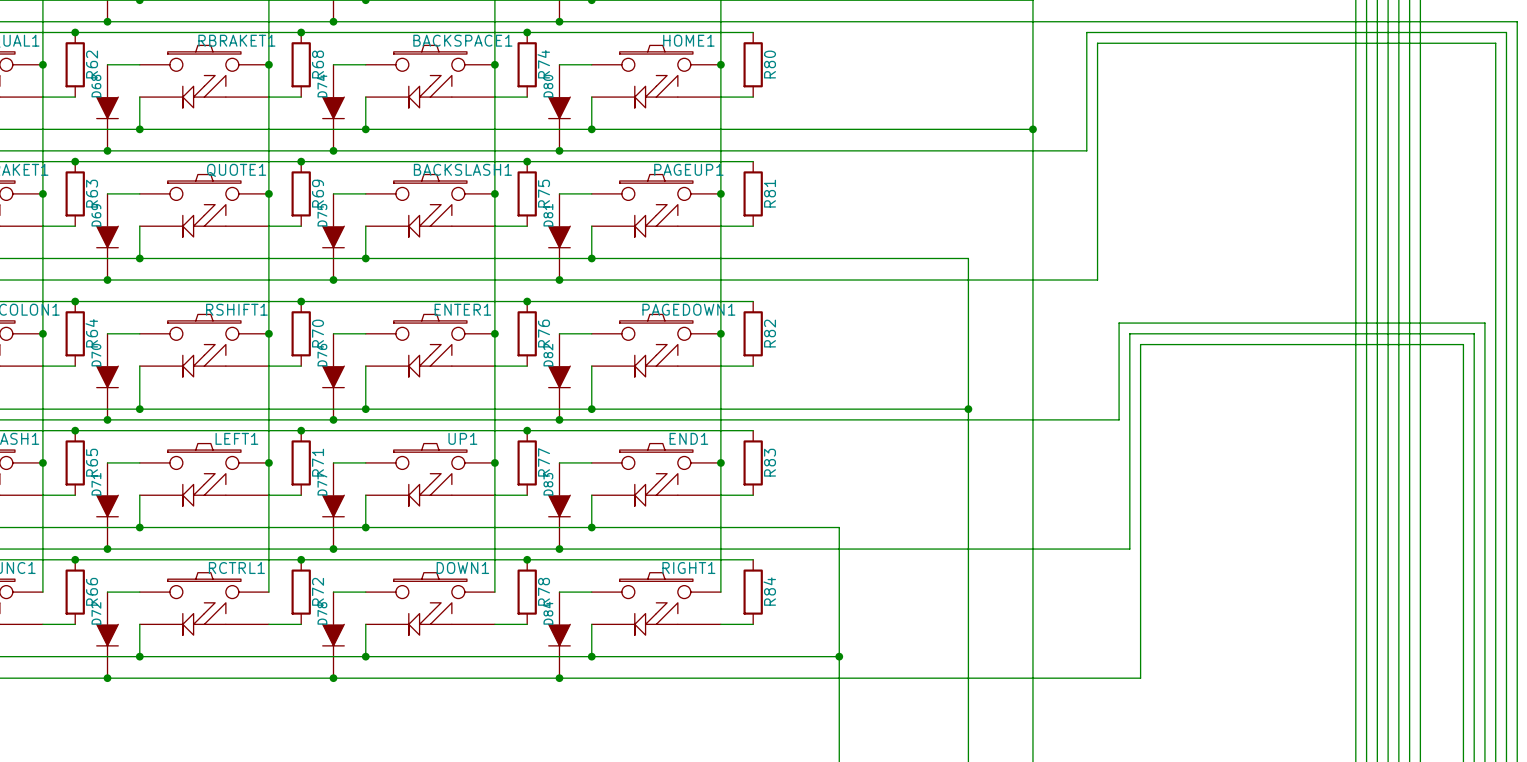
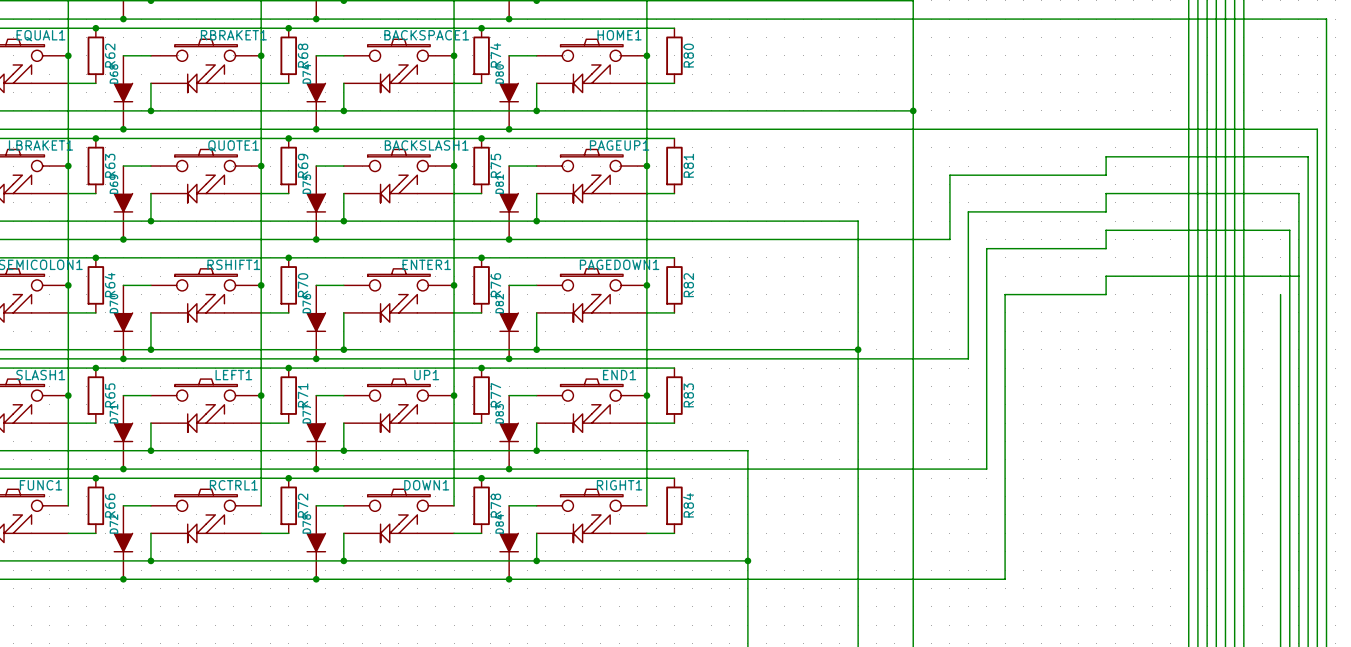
wire: (1086, 150) (1086, 32) (1506, 32) (1506, 150) -> (959, 129) (1317, 129)
wire: (1495, 183) (1495, 43) (1097, 43) (1097, 247) -> (1308, 156) (1106, 156) (1106, 175) (949, 175) (949, 239)
wire: none -> (968, 211) (1106, 211) (1106, 193) (1298, 193) (1298, 276)
wire: (1076, 280) (1097, 280) -> (968, 358) (968, 239)
wire: (1119, 323) (1258, 323) -> (1106, 294) (1106, 276)
wire: (1474, 333) (1129, 333) (1129, 549) (1119, 549) -> (1289, 285) (1289, 230) (1106, 230) (1106, 248) (986, 248) (986, 276)
wire: (1258, 344) (1463, 344) -> none
wire: (1097, 419) (1119, 419) -> (986, 469) (986, 358)

